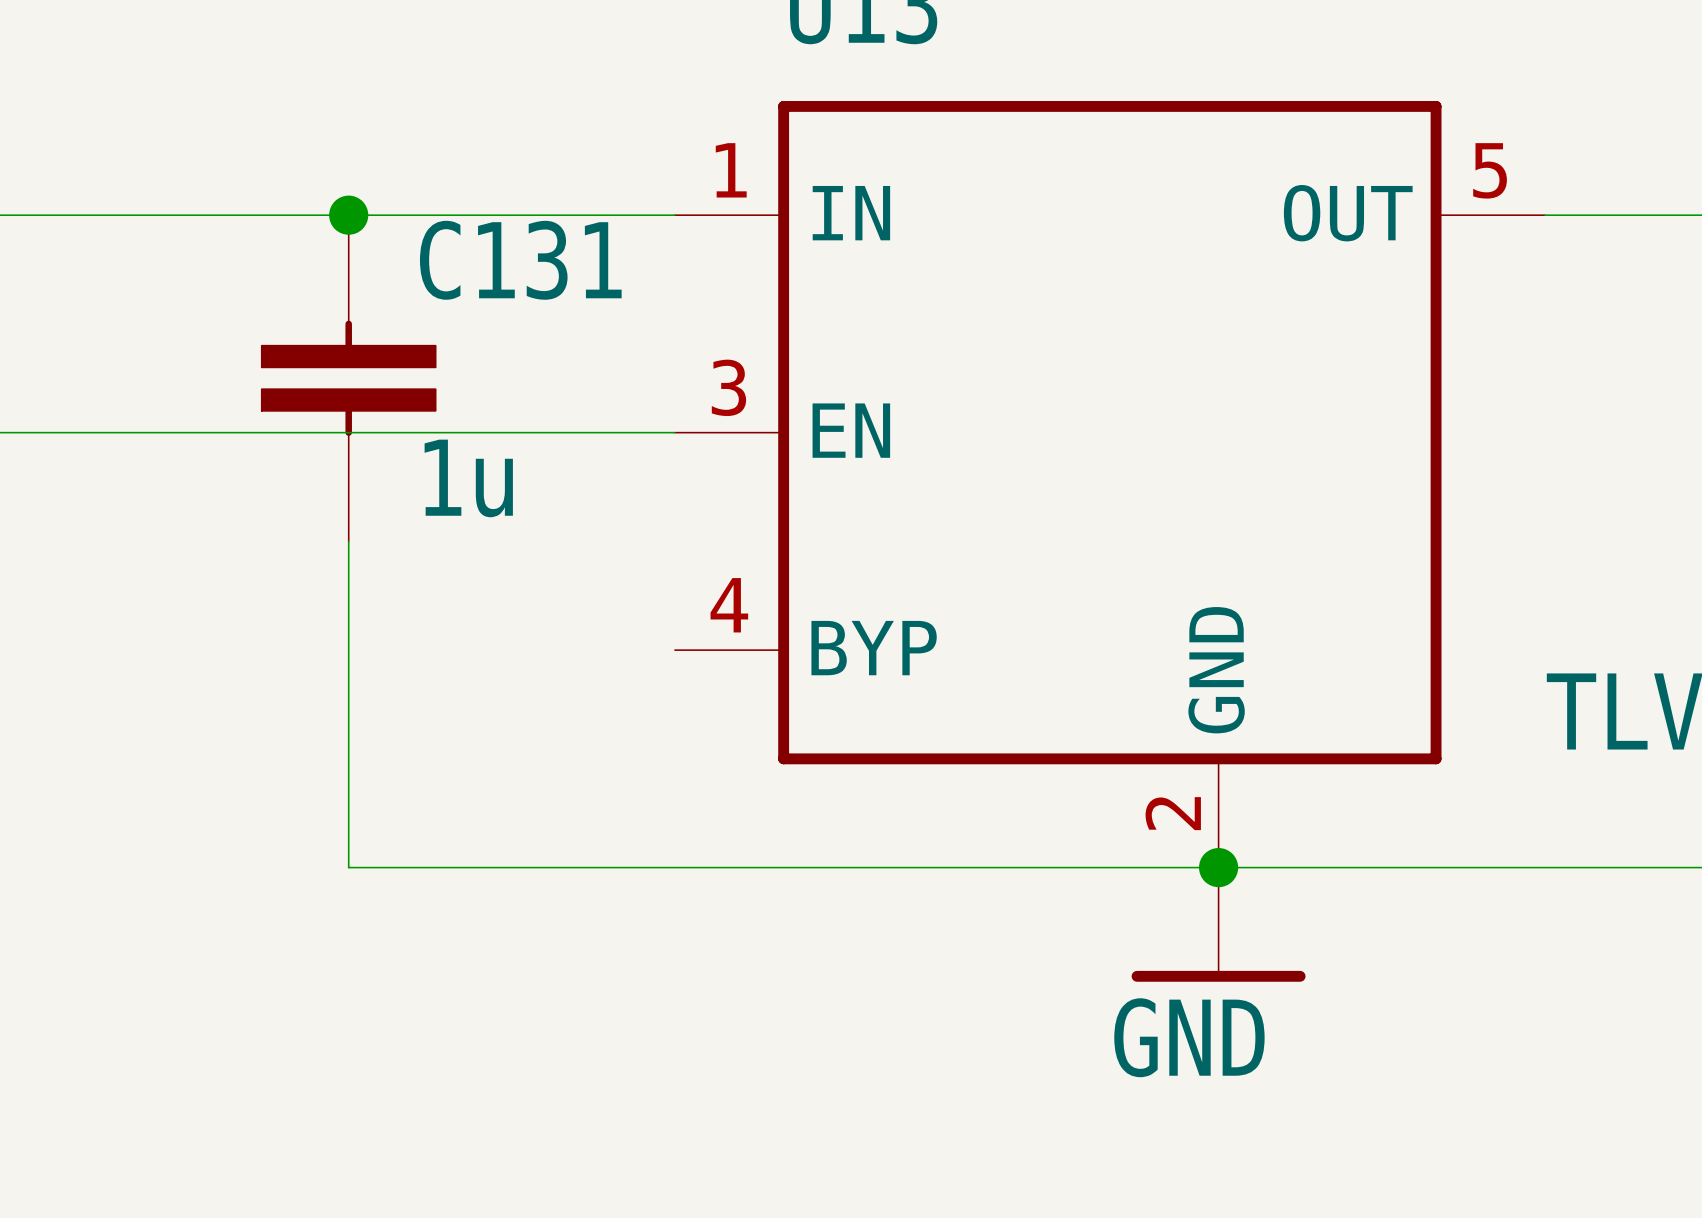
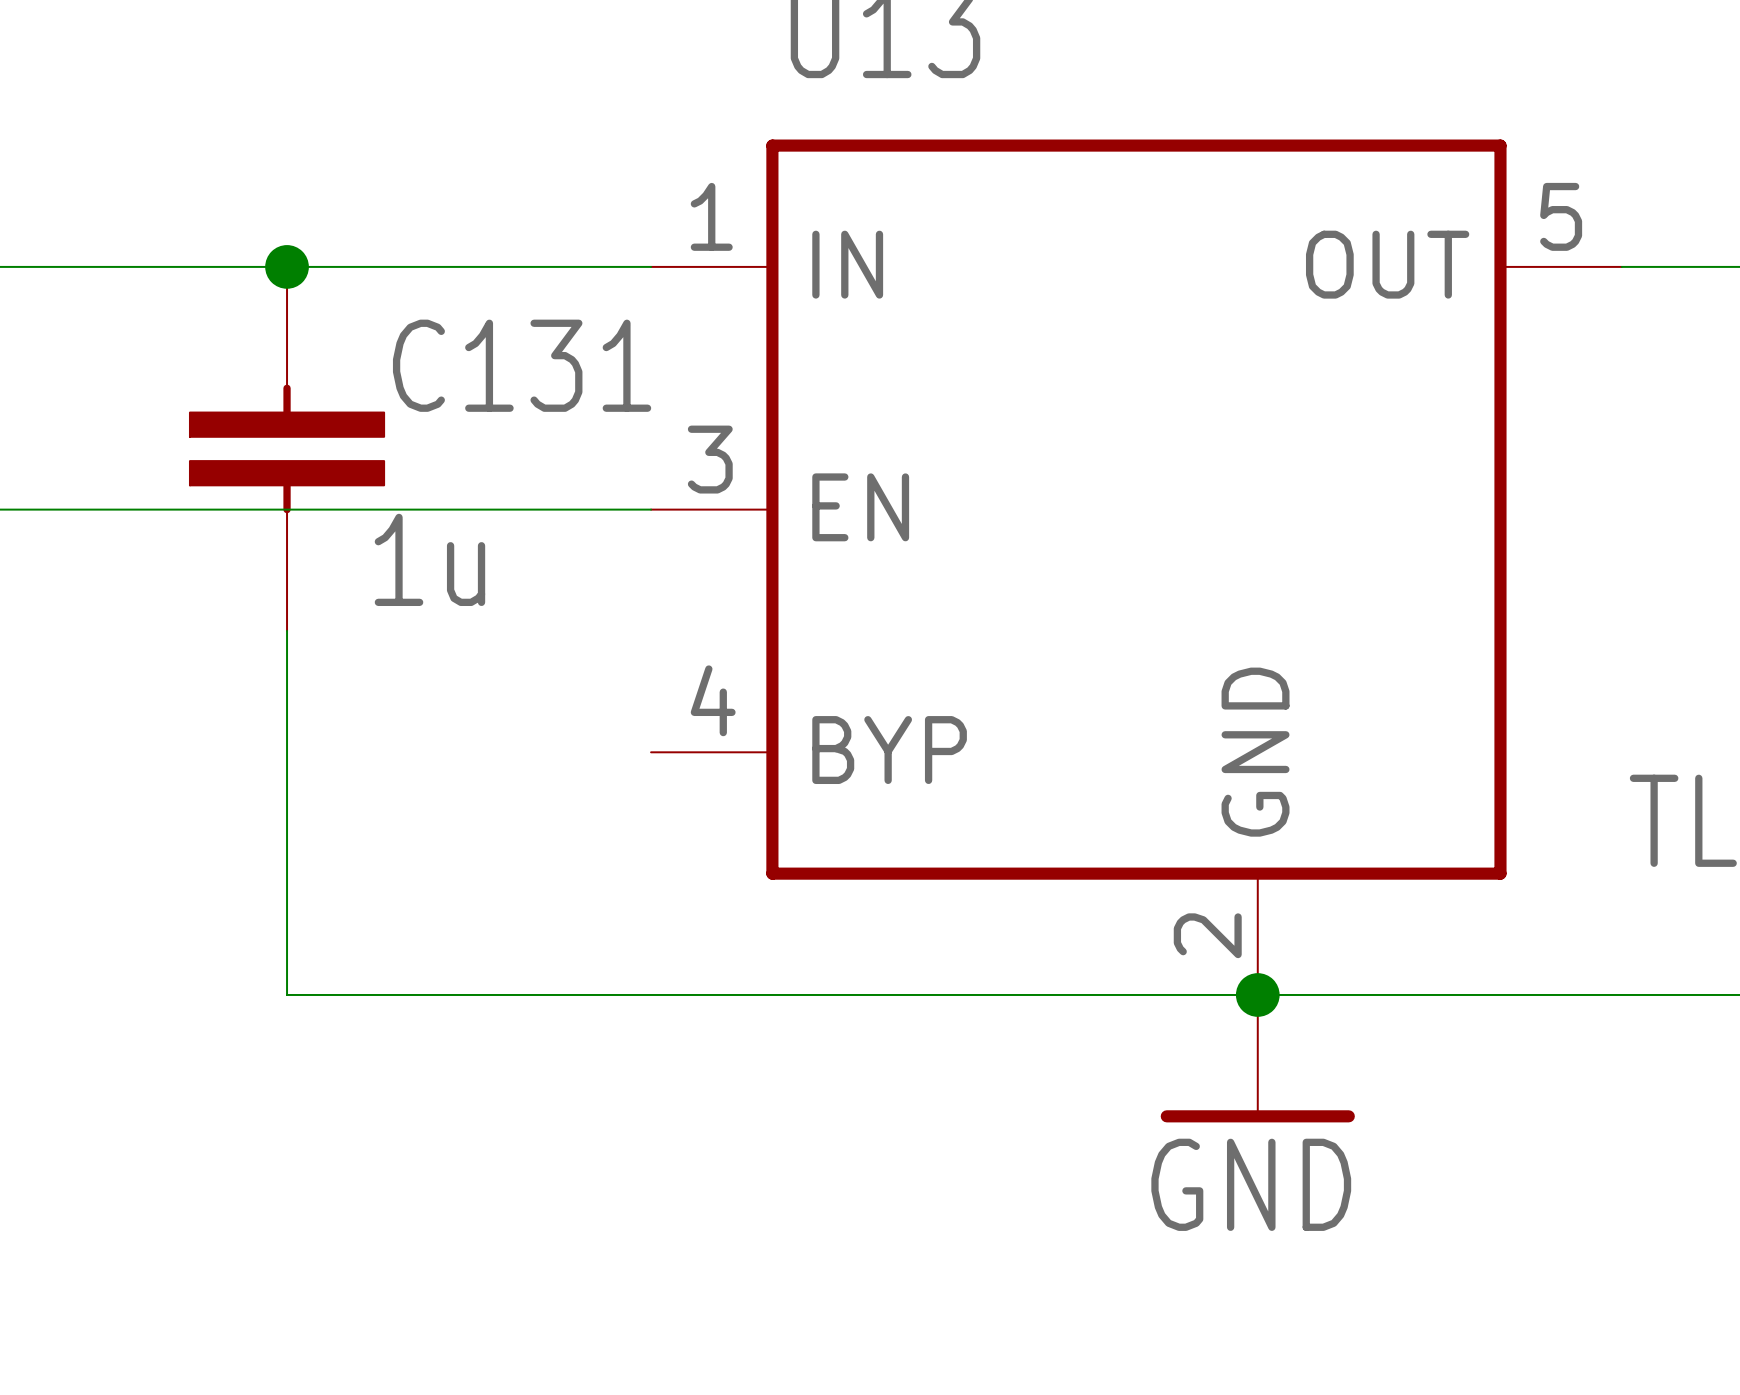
C131 name position: C131 (520, 260) -> C131 (522, 365)

